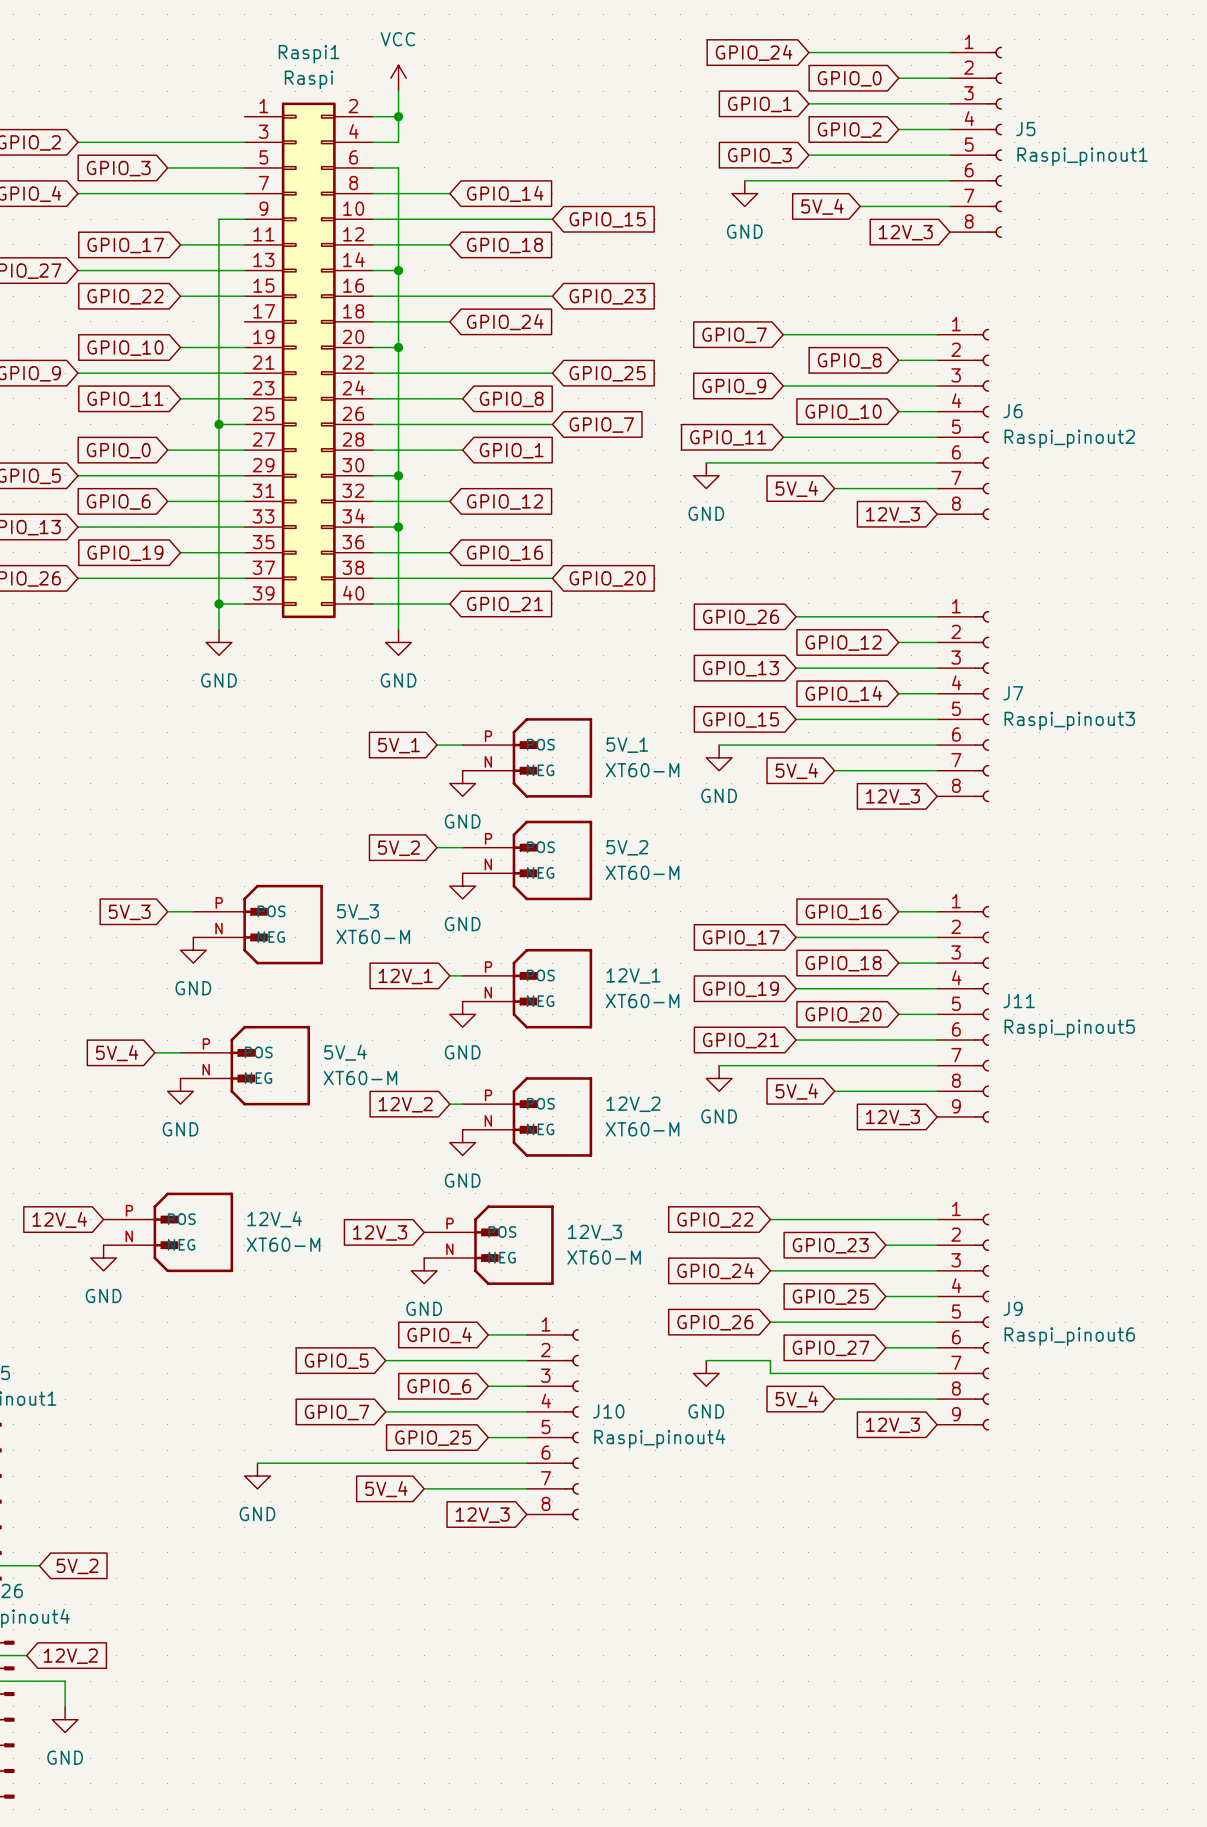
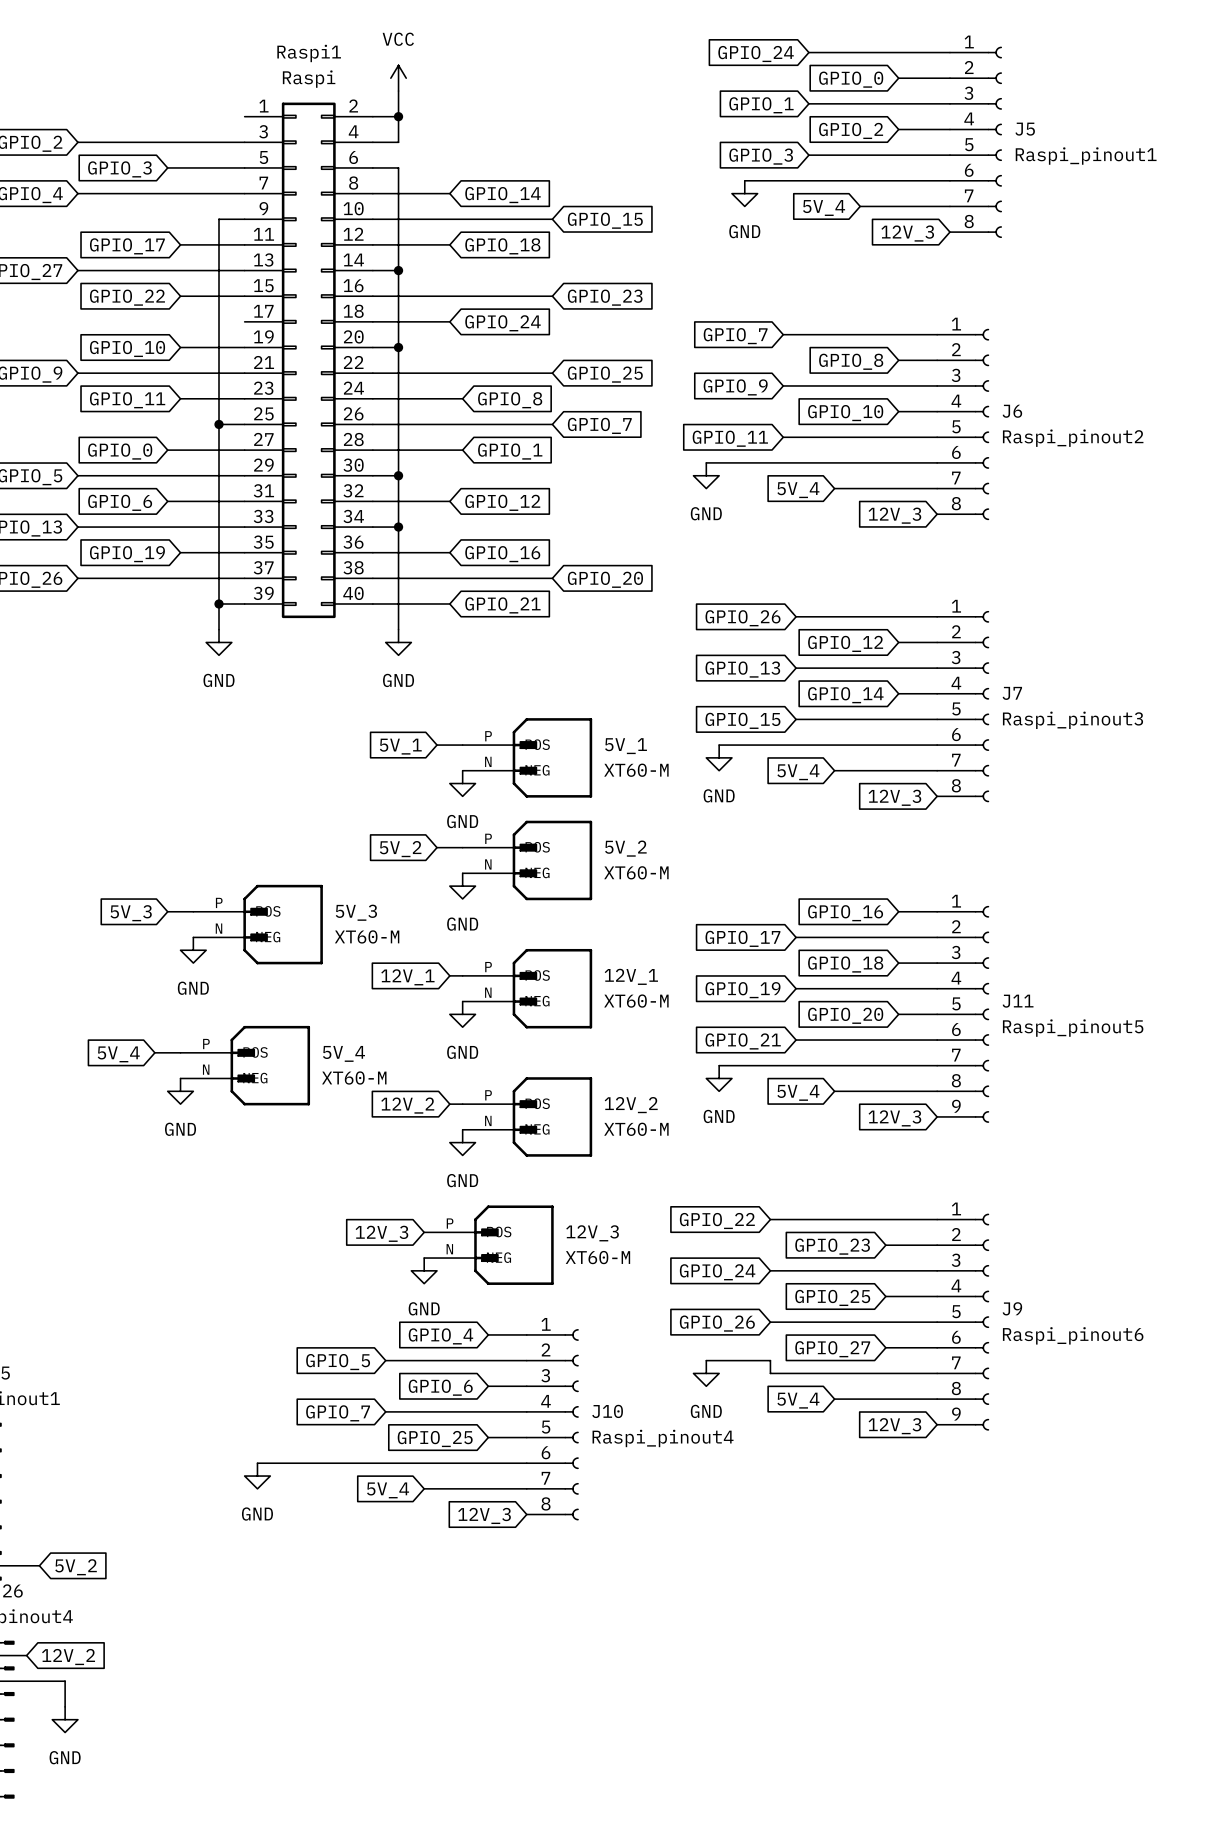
global label: 12V_4 (59, 1219) -> none
12V_4: XT60-M (168, 1232) -> none
power symbol: GND (103, 1258) -> none

